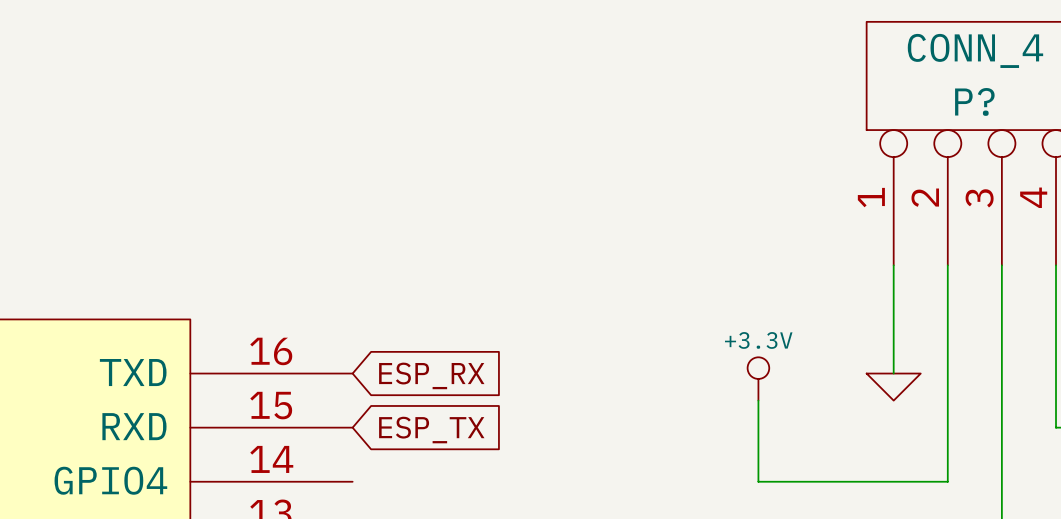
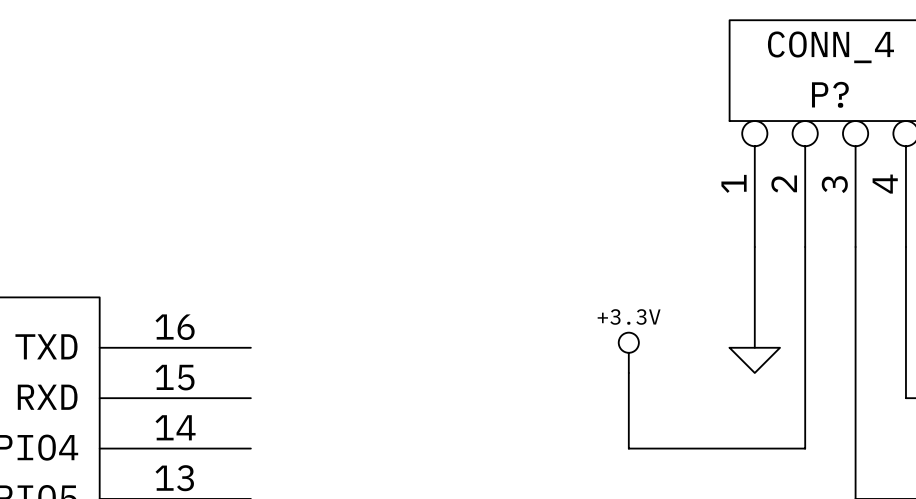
global label: ESP_RX (431, 375) -> none
global label: ESP_TX (431, 430) -> none

